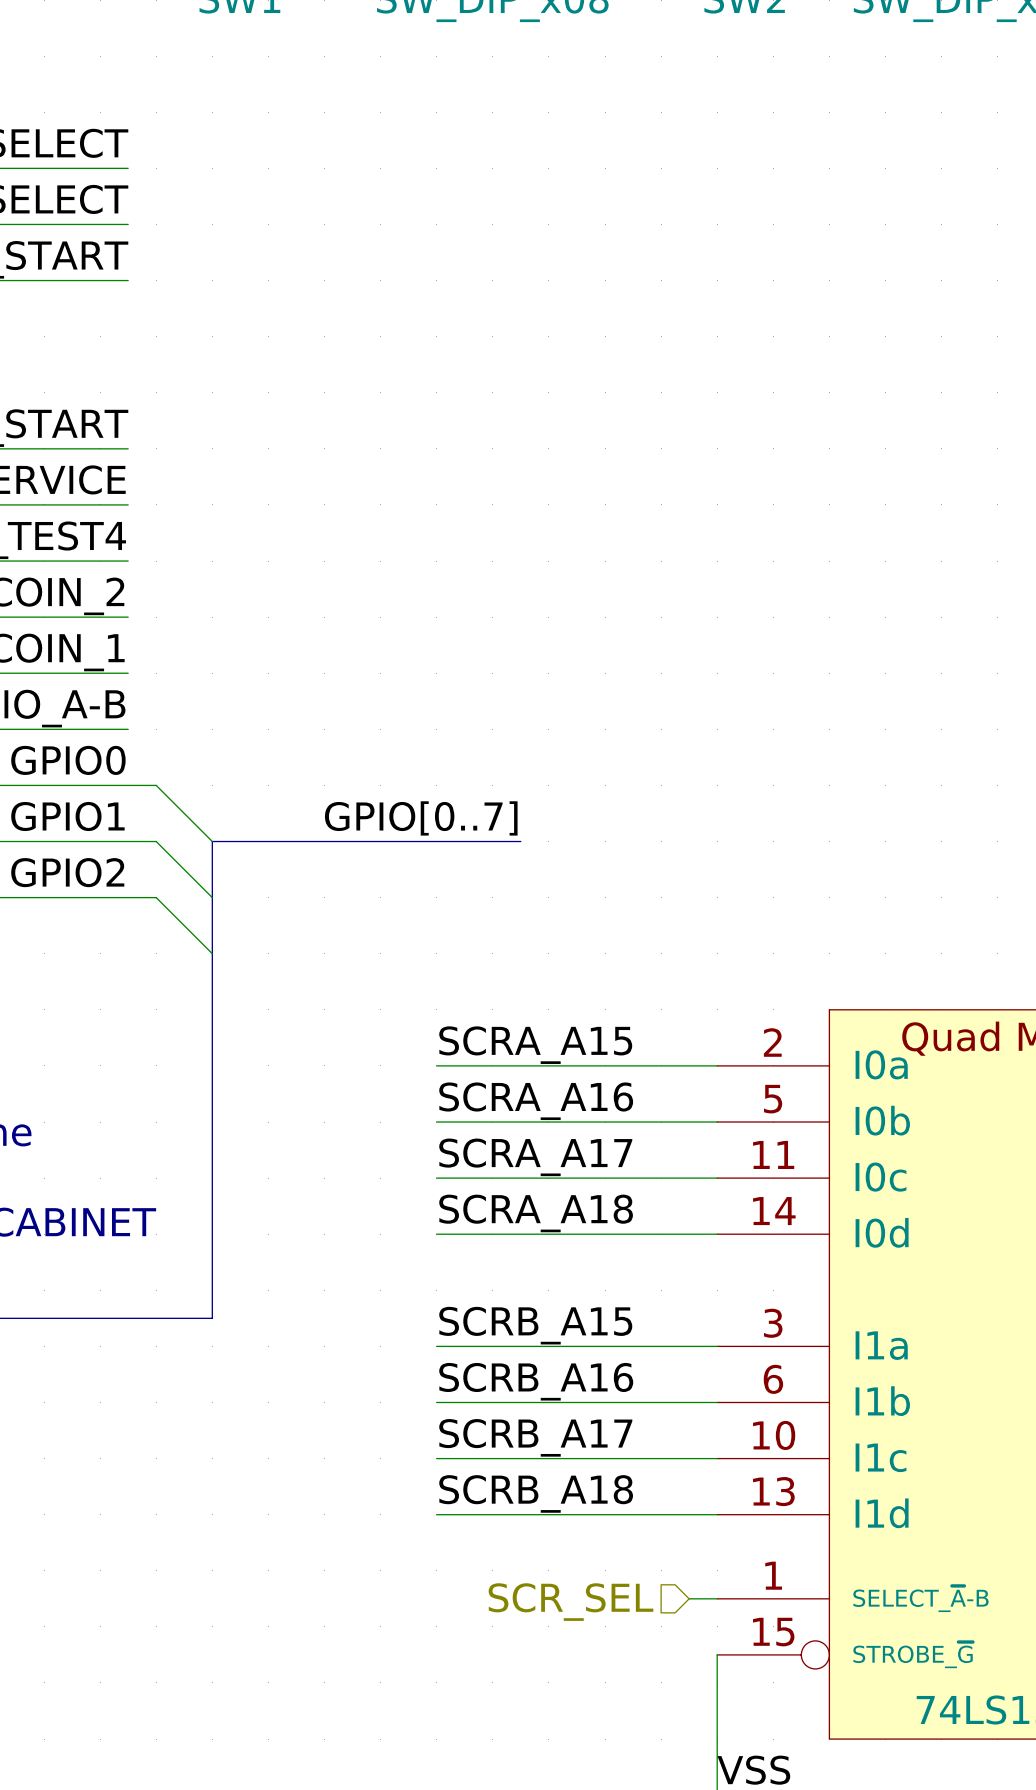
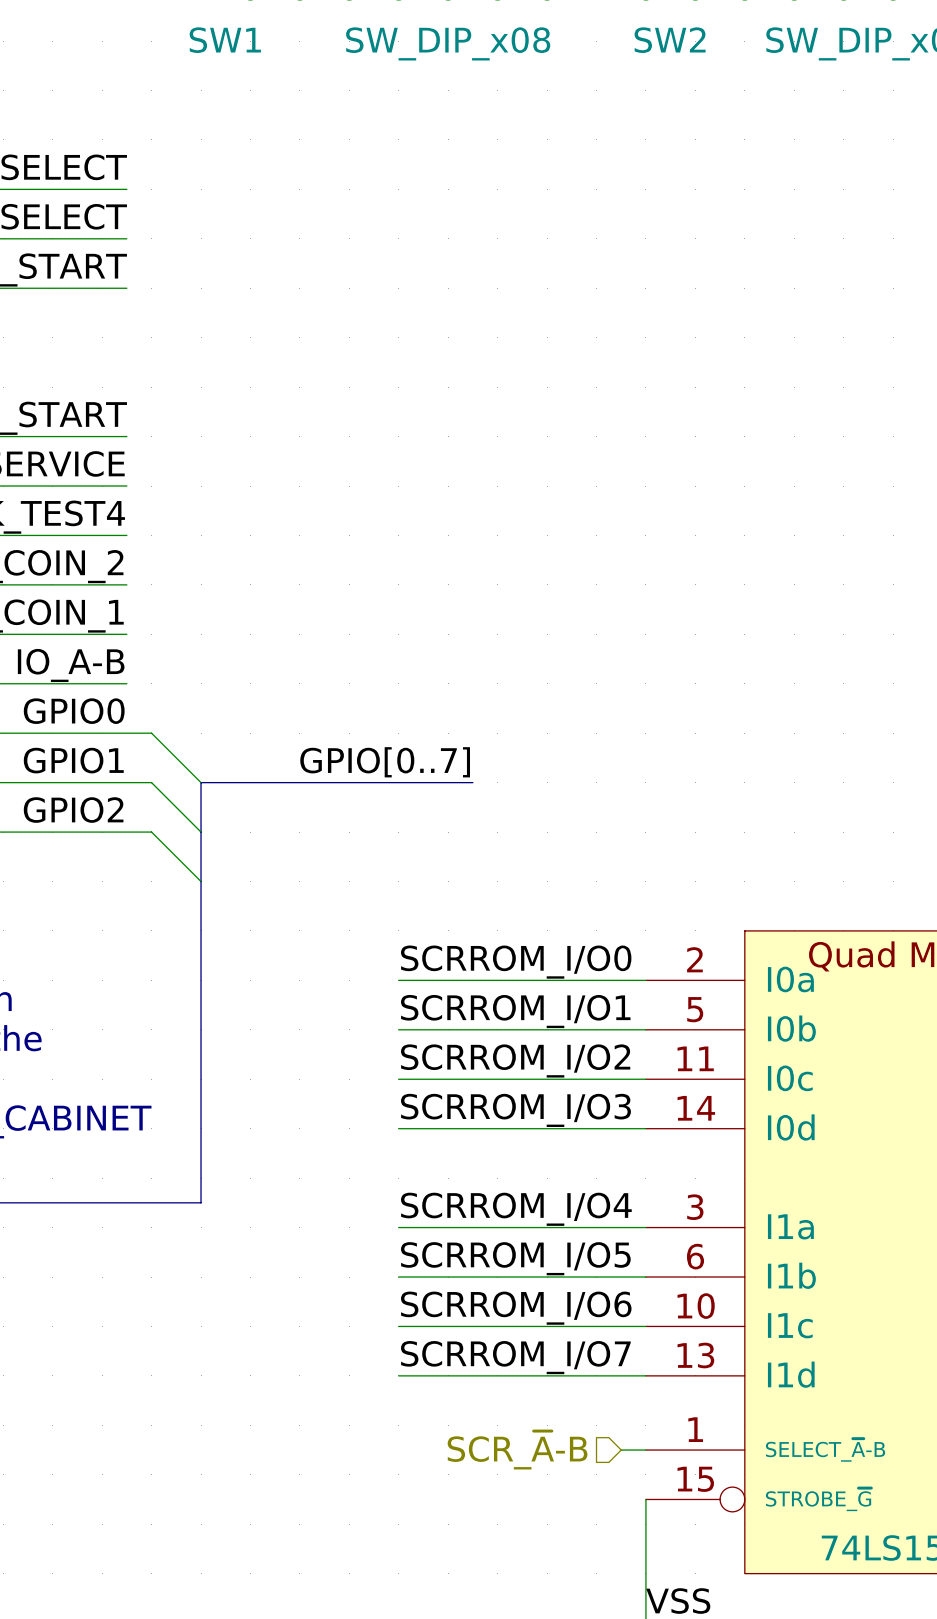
label: SCRA_A15 (535, 1045) -> SCRROM_I/O0 (516, 962)
label: SCRA_A16 (536, 1101) -> SCRROM_I/O1 (515, 1011)
label: SCRA_A17 (535, 1157) -> SCRROM_I/O2 (515, 1060)
label: SCRA_A18 (536, 1213) -> SCRROM_I/O3 (515, 1110)
label: SCRB_A15 (535, 1325) -> SCRROM_I/O4 (516, 1209)
label: SCRB_A16 (536, 1381) -> SCRROM_I/O5 (515, 1258)
label: SCRB_A17 (535, 1437) -> SCRROM_I/O6 (516, 1308)
label: SCRB_A18 (536, 1493) -> SCRROM_I/O7 (515, 1357)
hierarchical label: SCR_SEL (570, 1602) -> SCR_~{A}-B (517, 1450)

